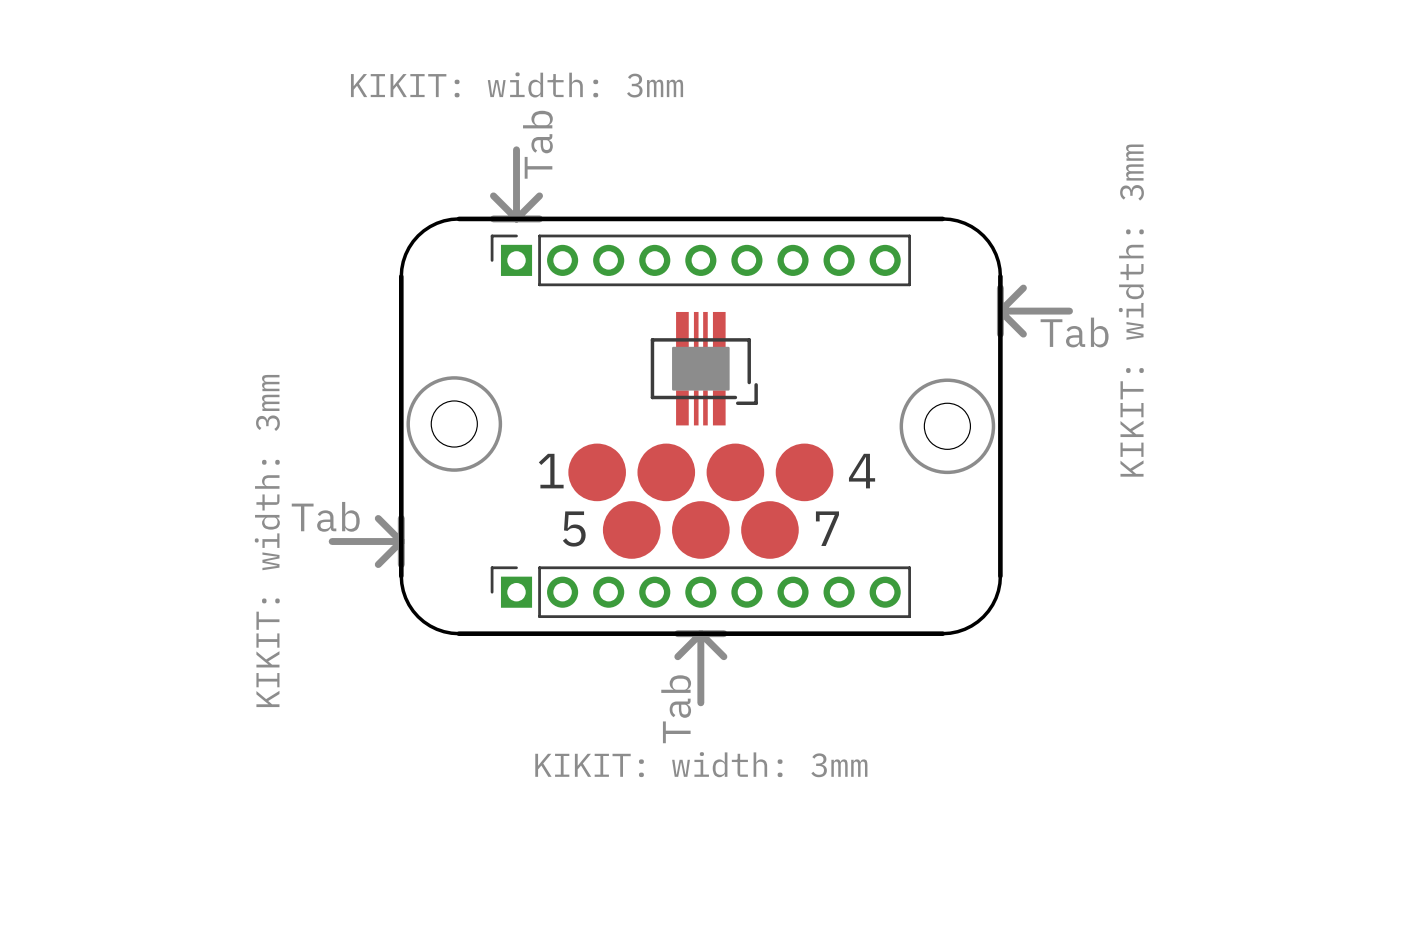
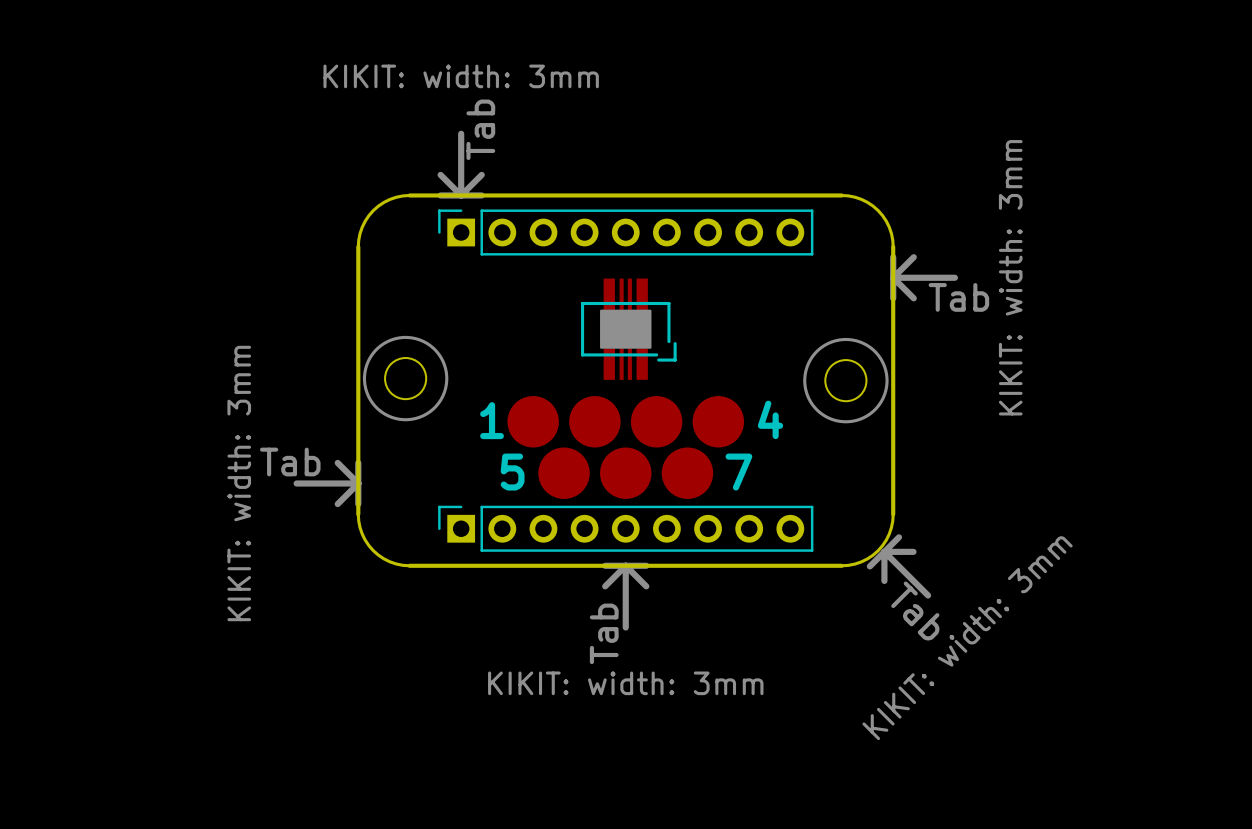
drawing: none -> [866, 534, 932, 599]

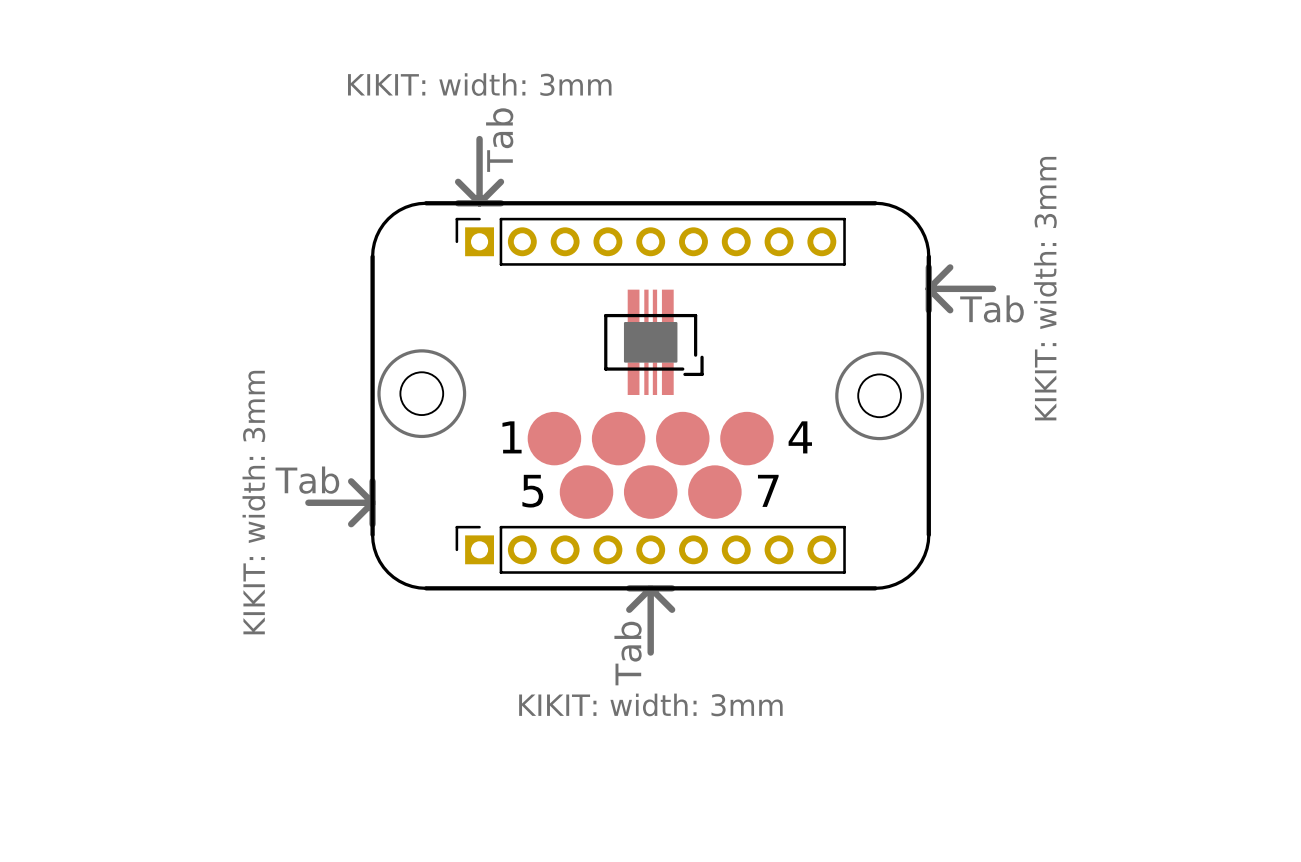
drawing shape: [323, 64, 599, 199] -> [348, 73, 612, 207]
drawing shape: [890, 140, 1023, 416] -> [925, 156, 1057, 421]
drawing shape: [227, 345, 362, 622] -> [242, 370, 376, 635]
drawing: [866, 534, 932, 599] -> none
drawing shape: [488, 562, 764, 696] -> [519, 585, 783, 717]

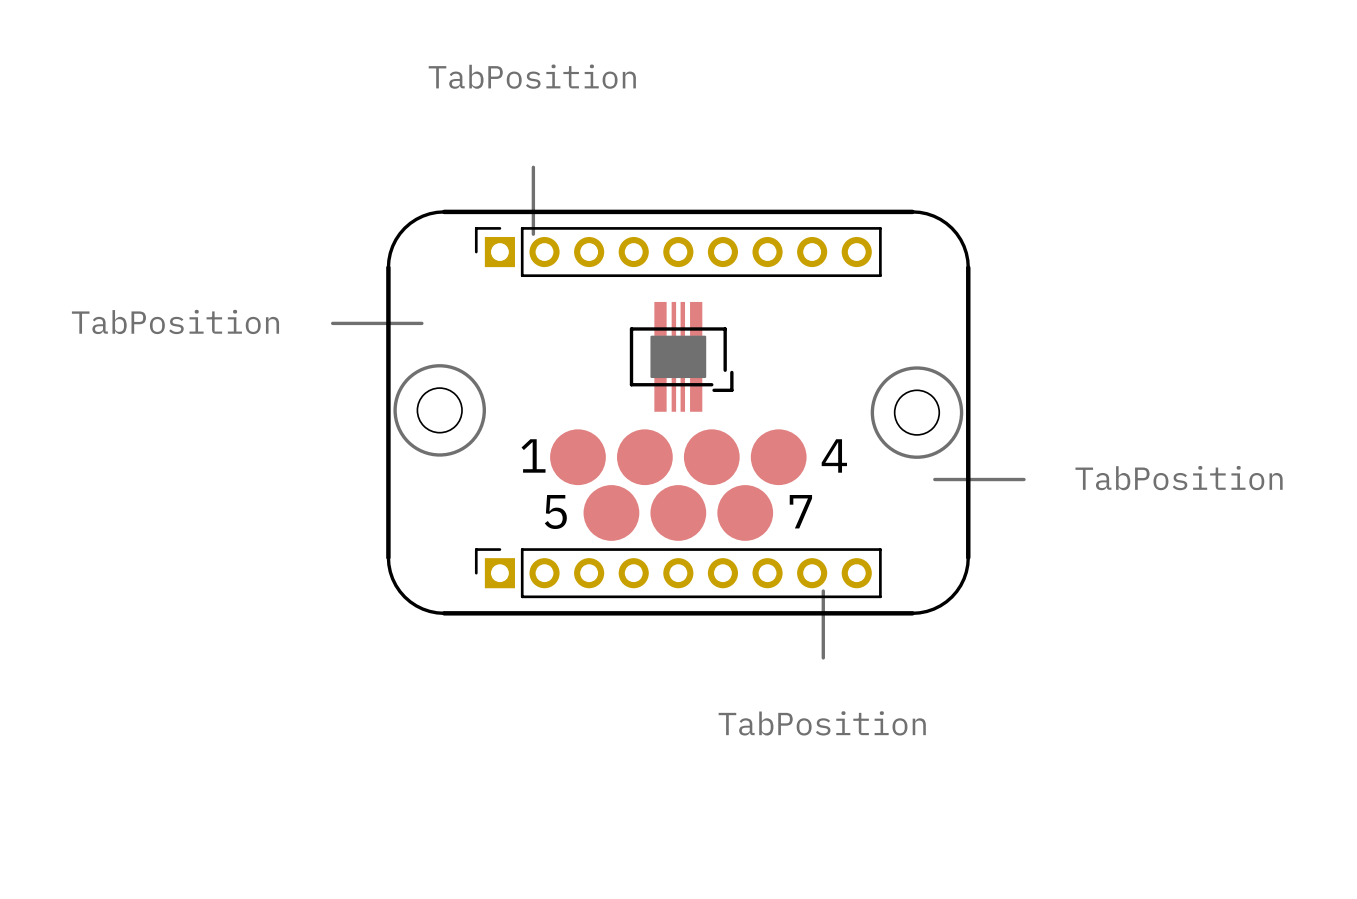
text: none -> TabPosition (532, 76)
drawing: [454, 135, 505, 207] -> none
line: none -> (533, 167) (533, 234)
drawing: [925, 264, 997, 314] -> none
text: none -> TabPosition (175, 321)
line: none -> (332, 323) (421, 323)
text: none -> TabPosition (1179, 478)
line: none -> (934, 479) (1024, 479)
drawing: [305, 478, 376, 528] -> none
line: none -> (823, 591) (823, 657)
drawing: [626, 585, 676, 656] -> none
text: none -> TabPosition (822, 723)

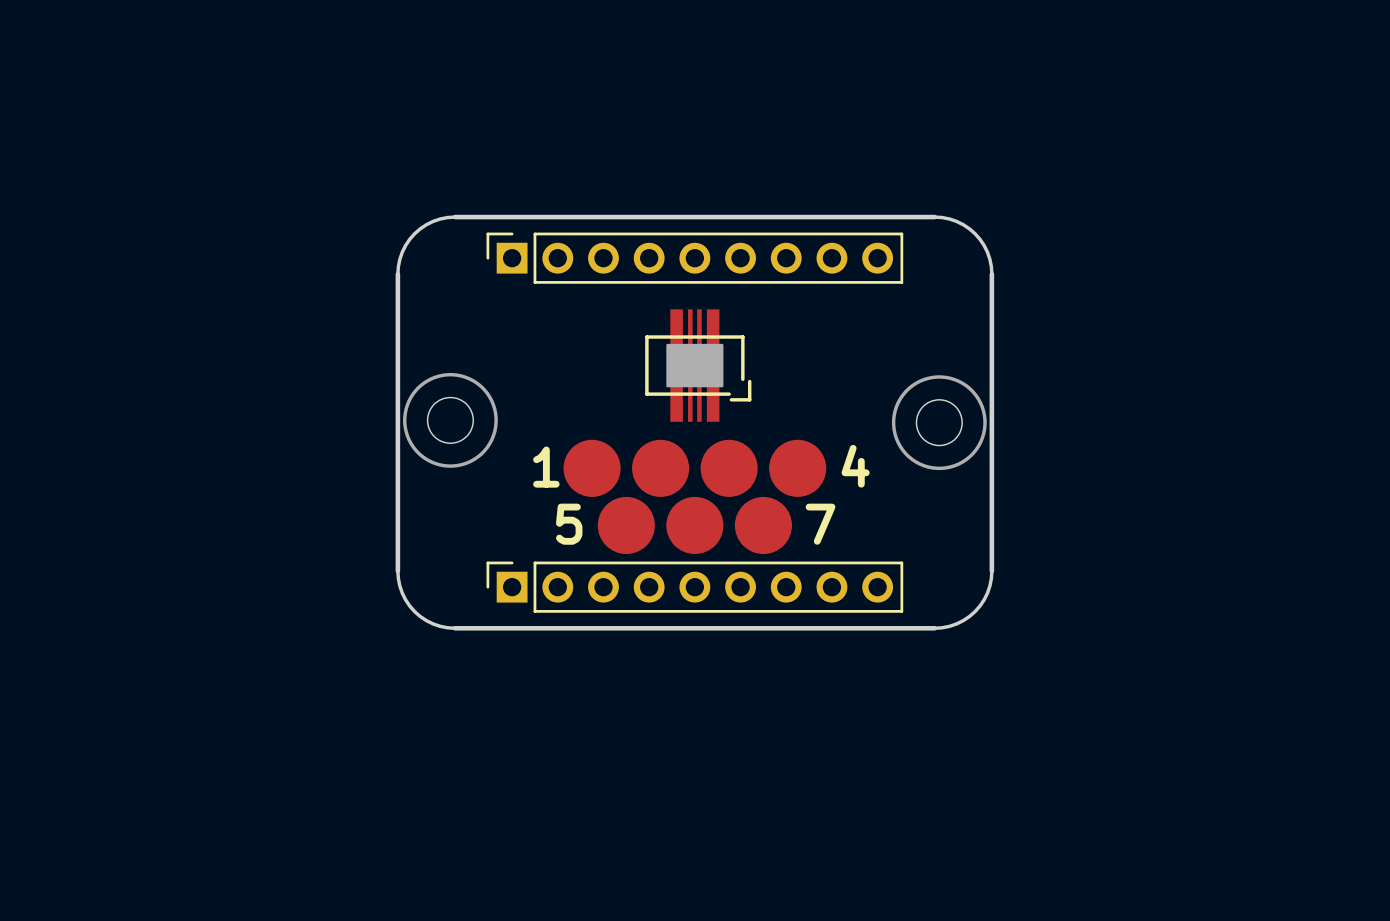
text: TabPosition (532, 76) -> none
line: (533, 167) (533, 234) -> none
text: TabPosition (175, 321) -> none
line: (332, 323) (421, 323) -> none
text: TabPosition (1179, 478) -> none
line: (934, 479) (1024, 479) -> none
line: (823, 591) (823, 657) -> none
text: TabPosition (822, 723) -> none

